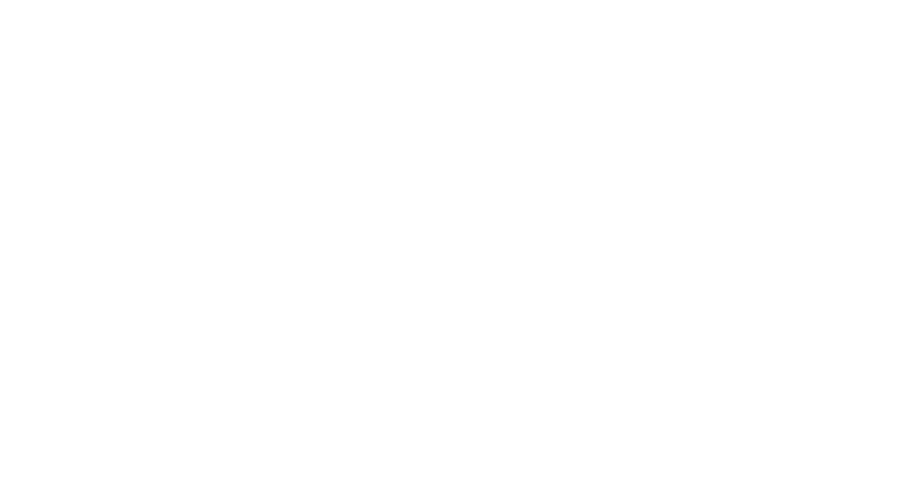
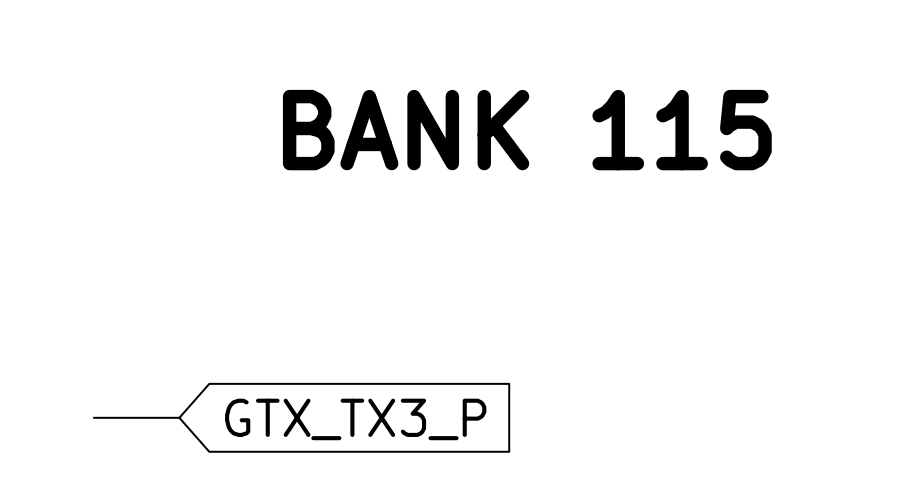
text: none -> BANK 115 (527, 130)
wire: none -> (93, 417) (179, 417)
global label: none -> GTX_TX3_P (355, 419)

